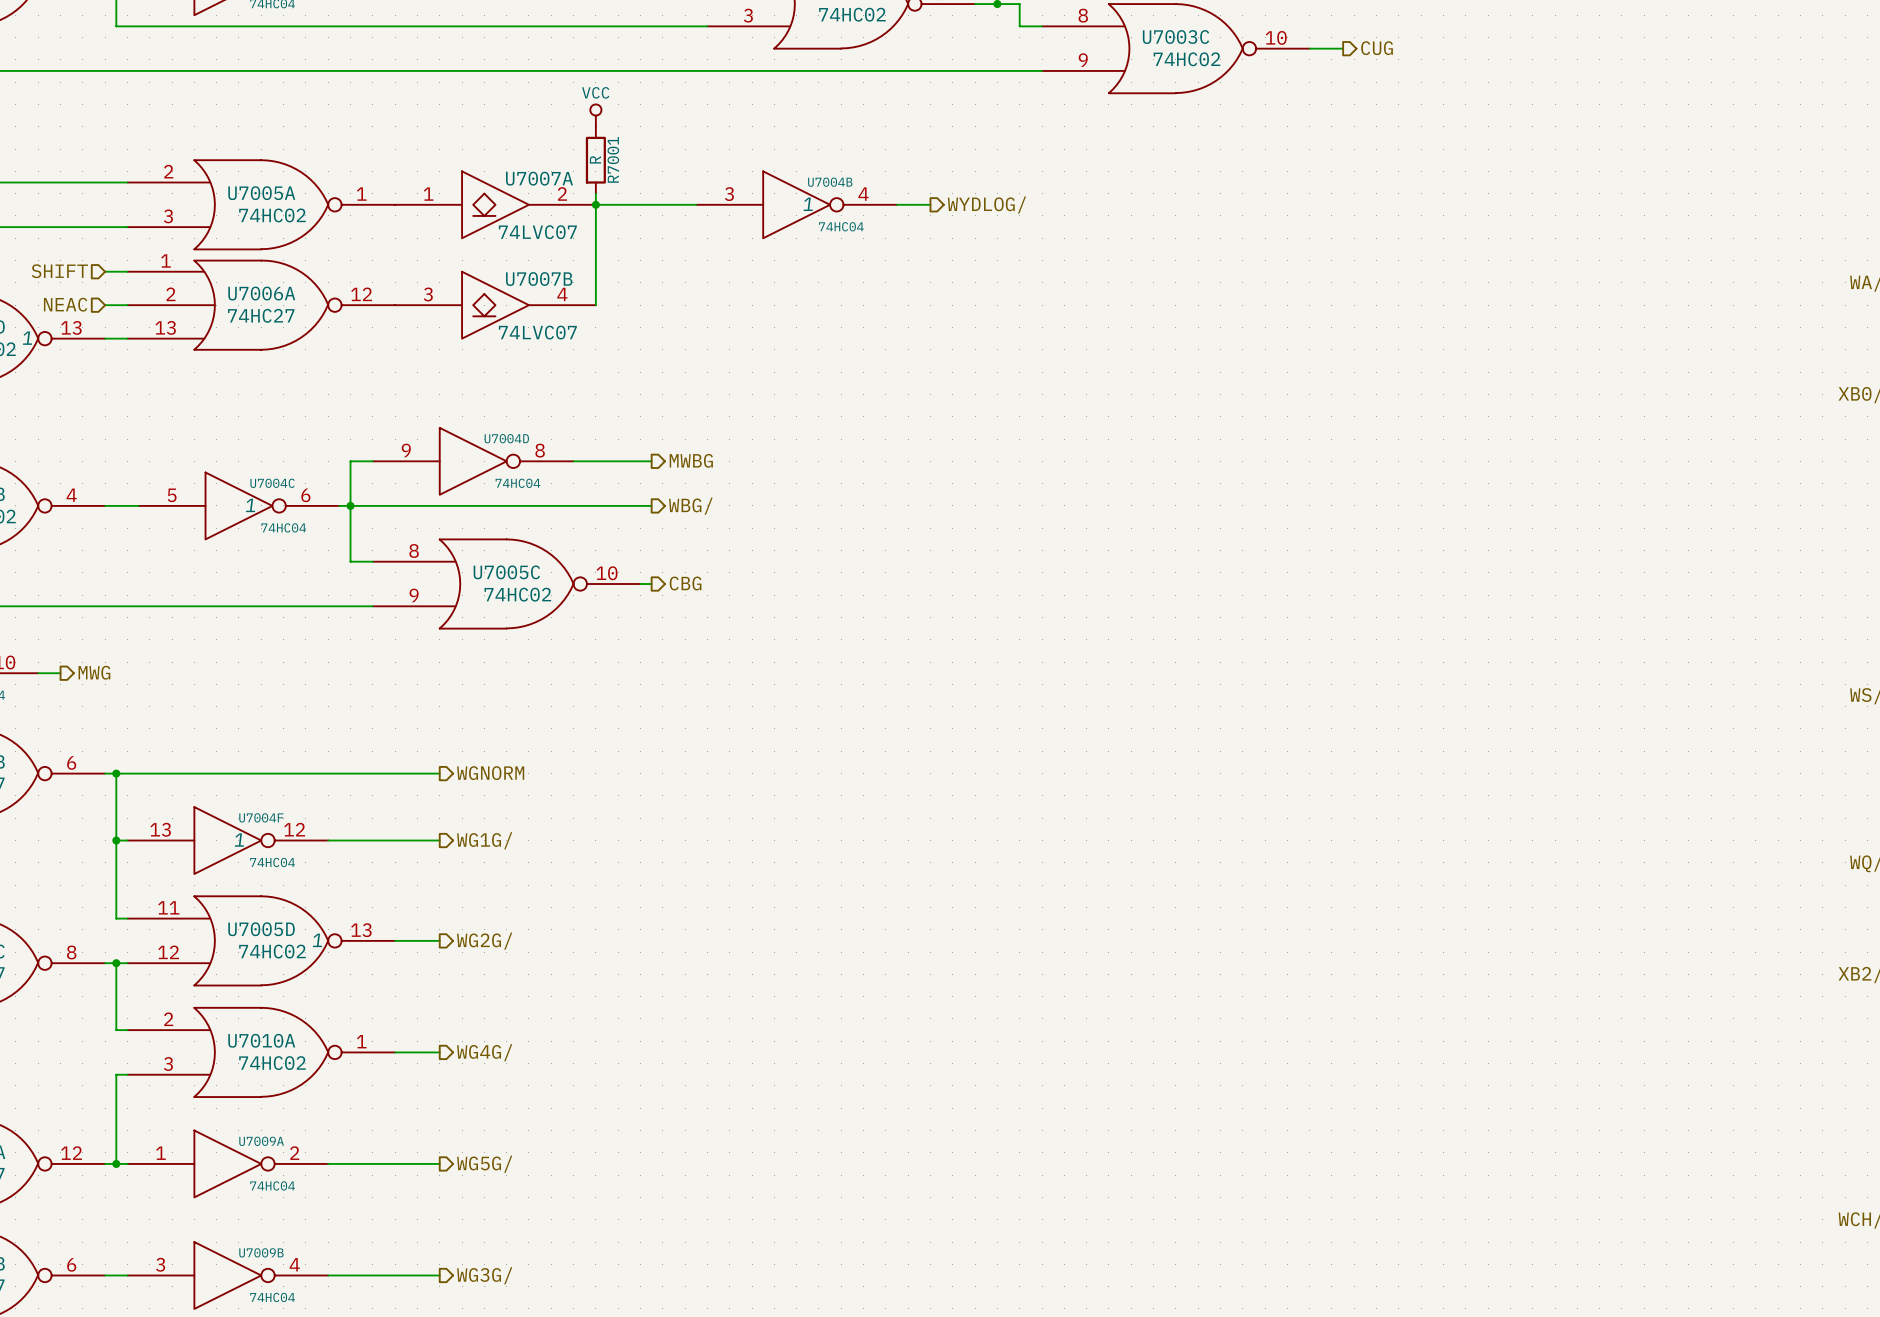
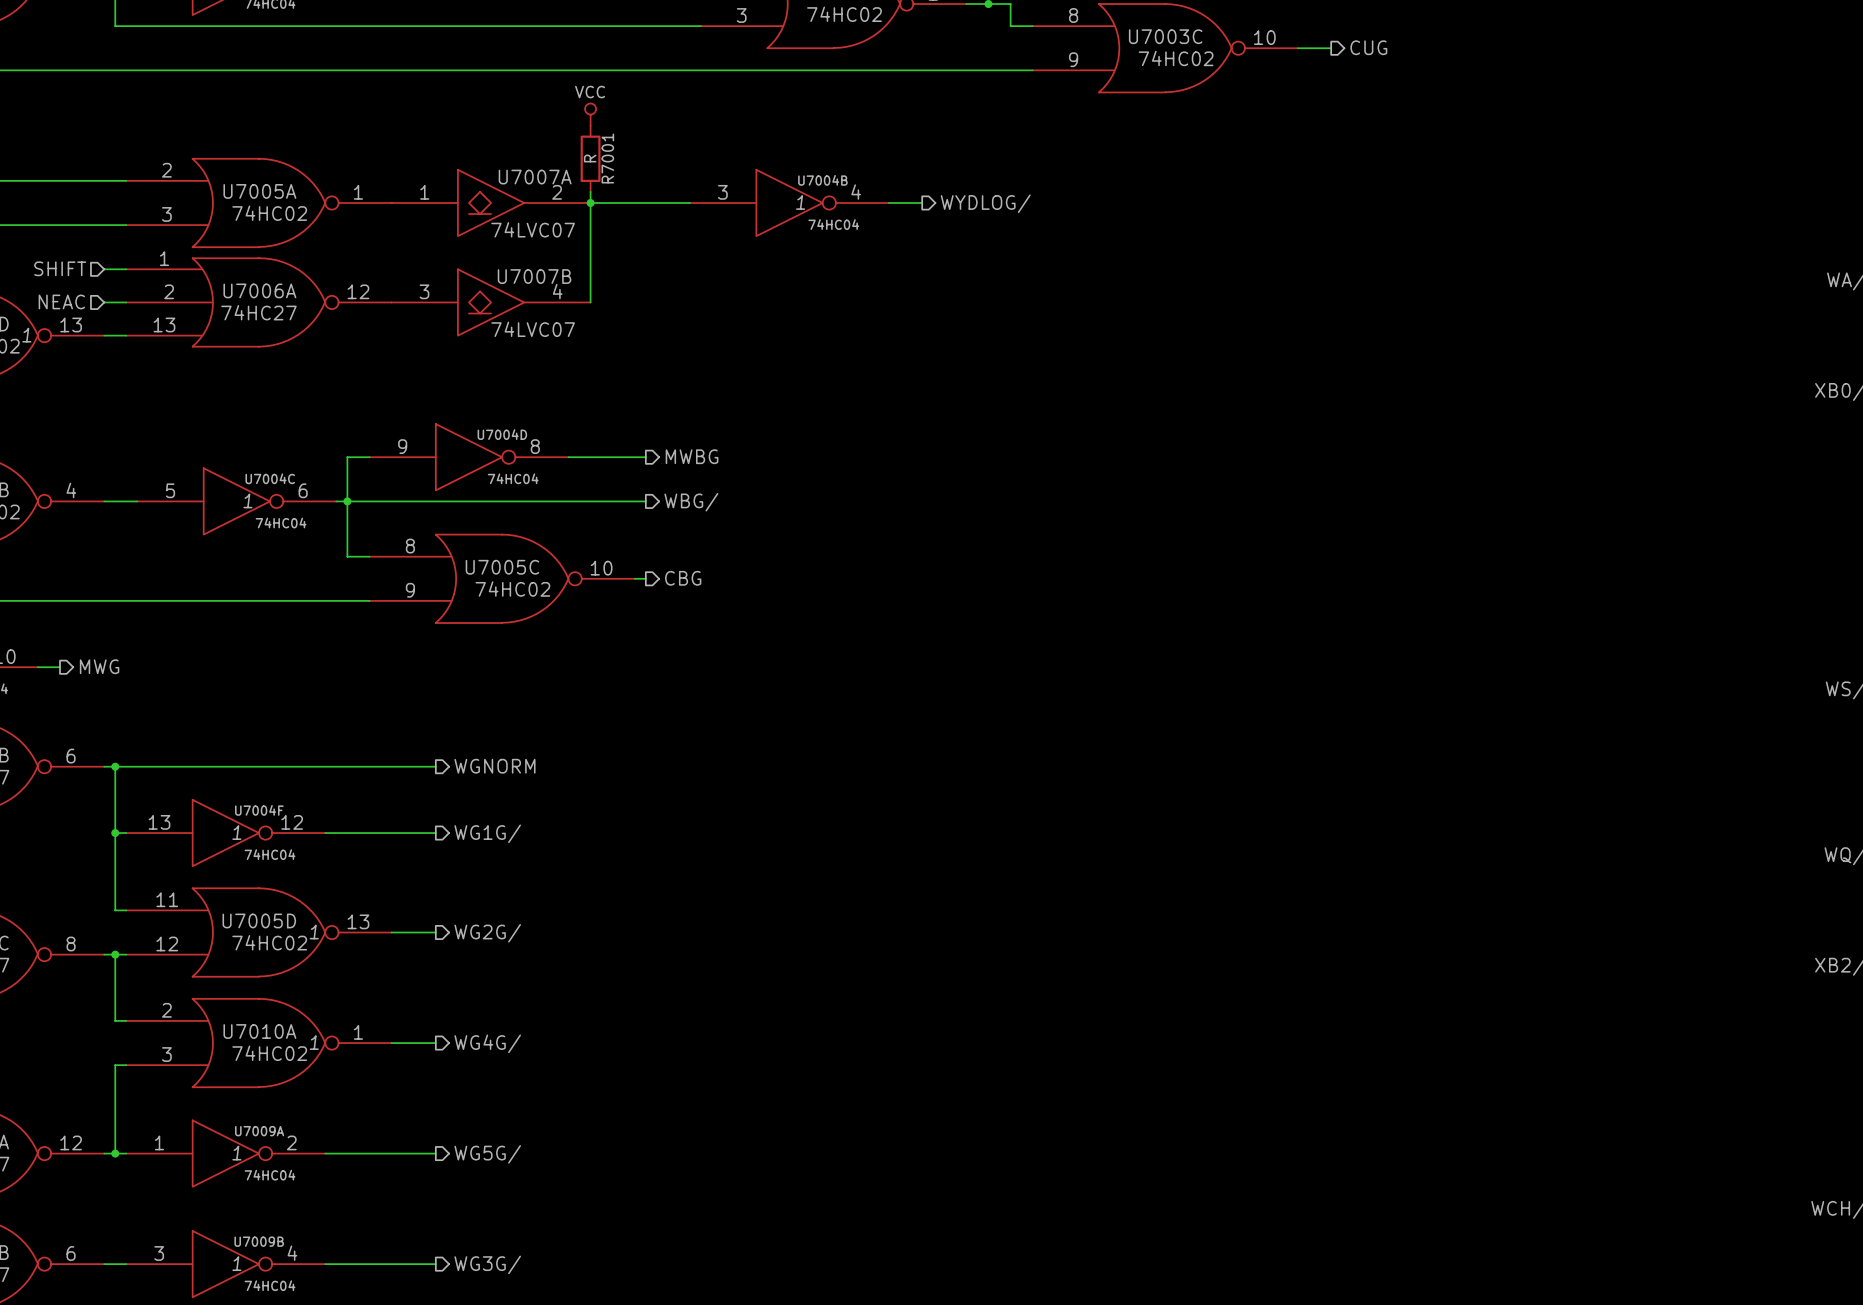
U7010A text: none -> 1 (314, 1042)
U7009A text: none -> 1 (236, 1153)
U7009B text: none -> 1 (236, 1263)

